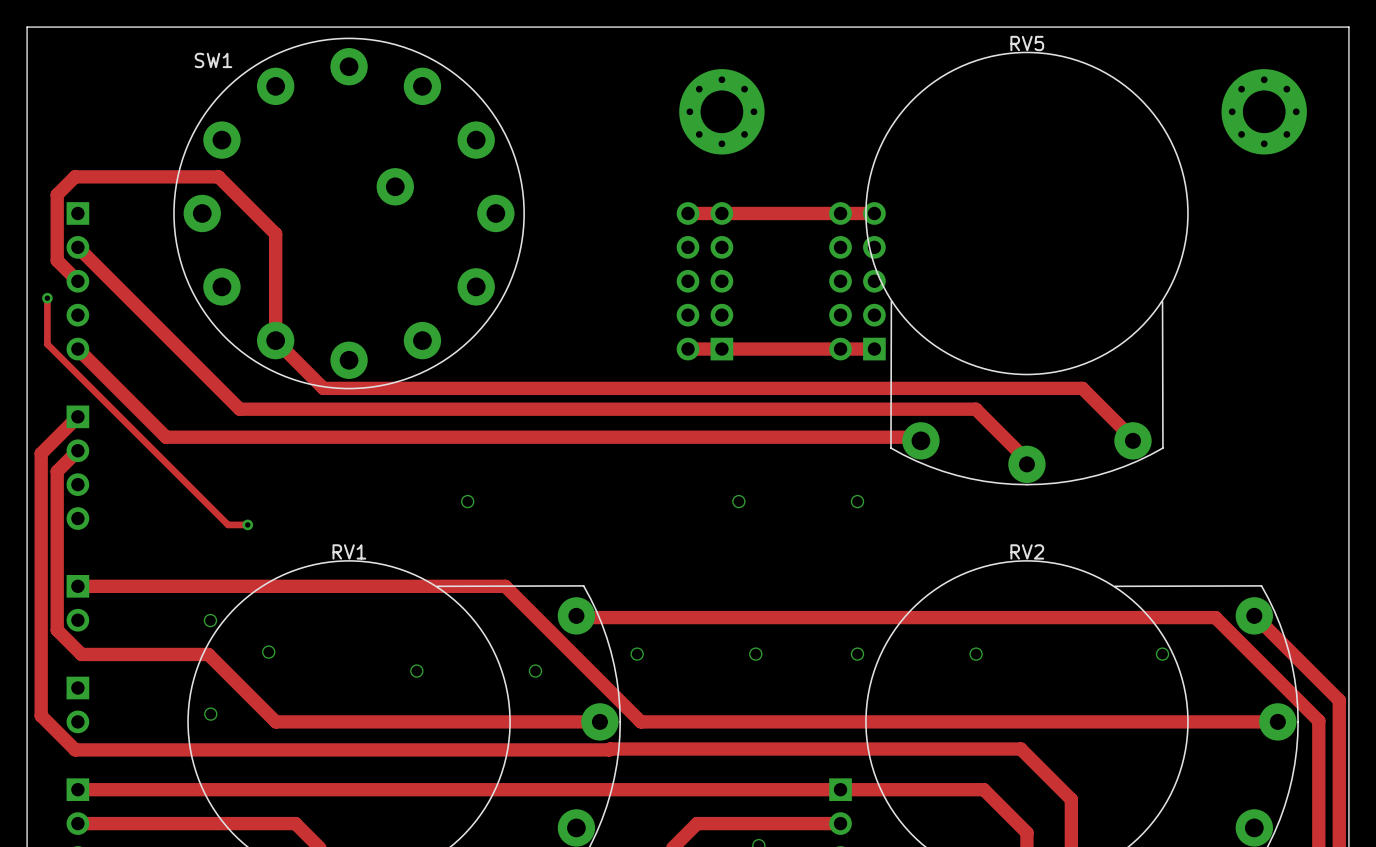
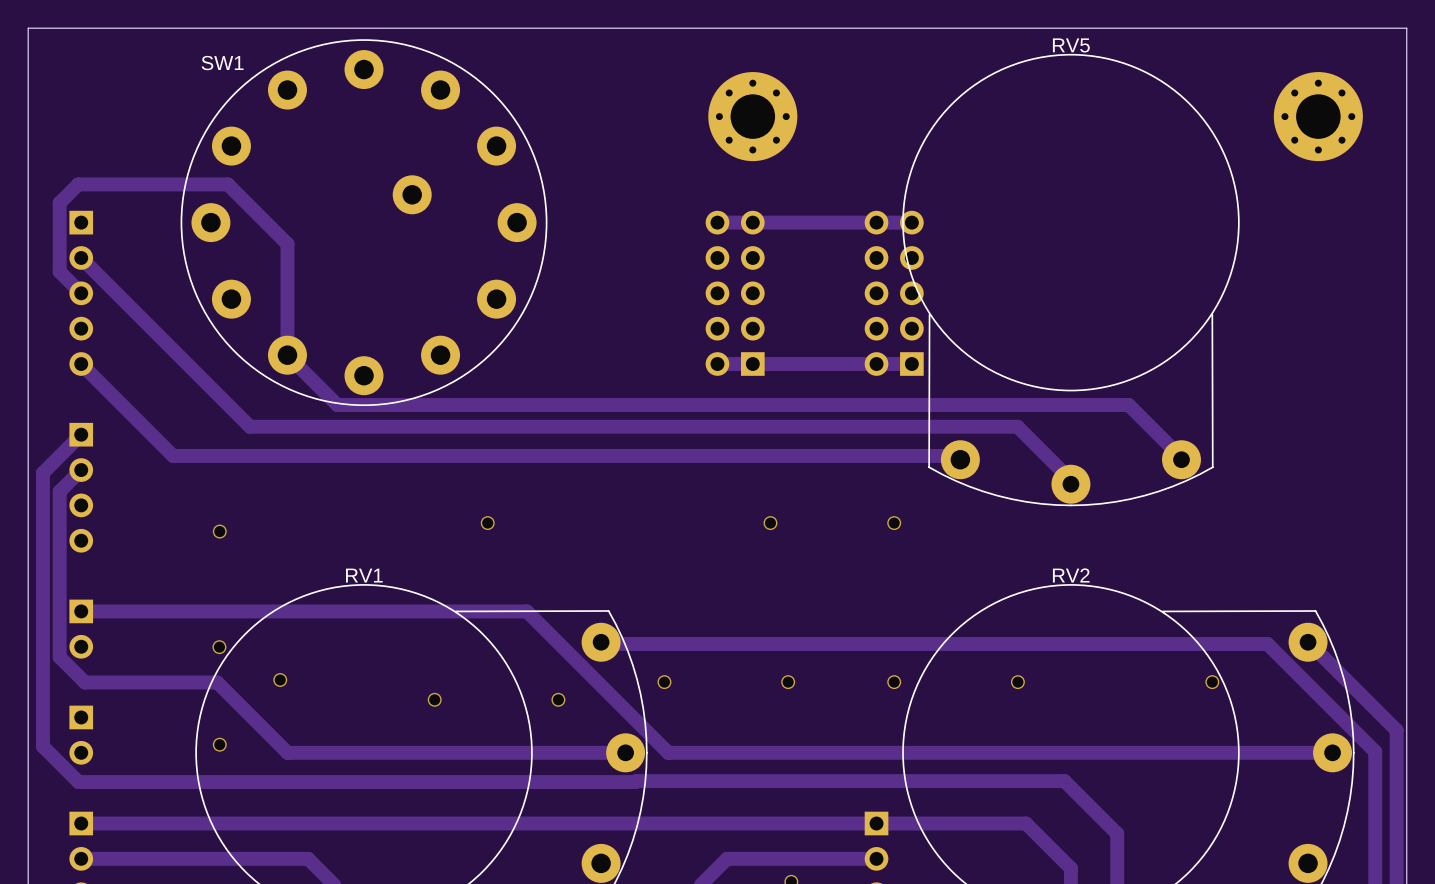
track: (47, 298) (47, 344) (228, 524) (247, 524) -> none
via: (47, 298) -> none
via: none -> (219, 531)
via: (247, 524) -> none

